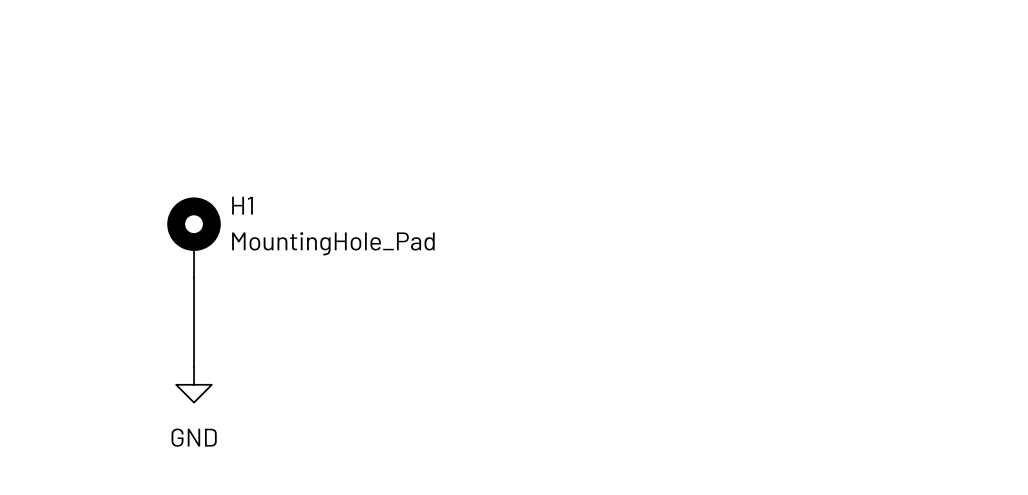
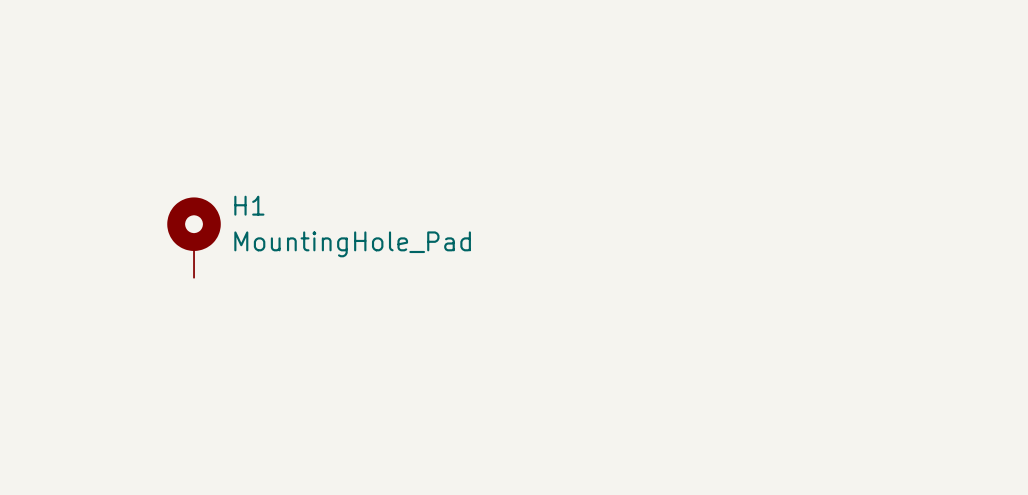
wire: (194, 277) (194, 366) -> none
power symbol: GND (194, 384) -> none

